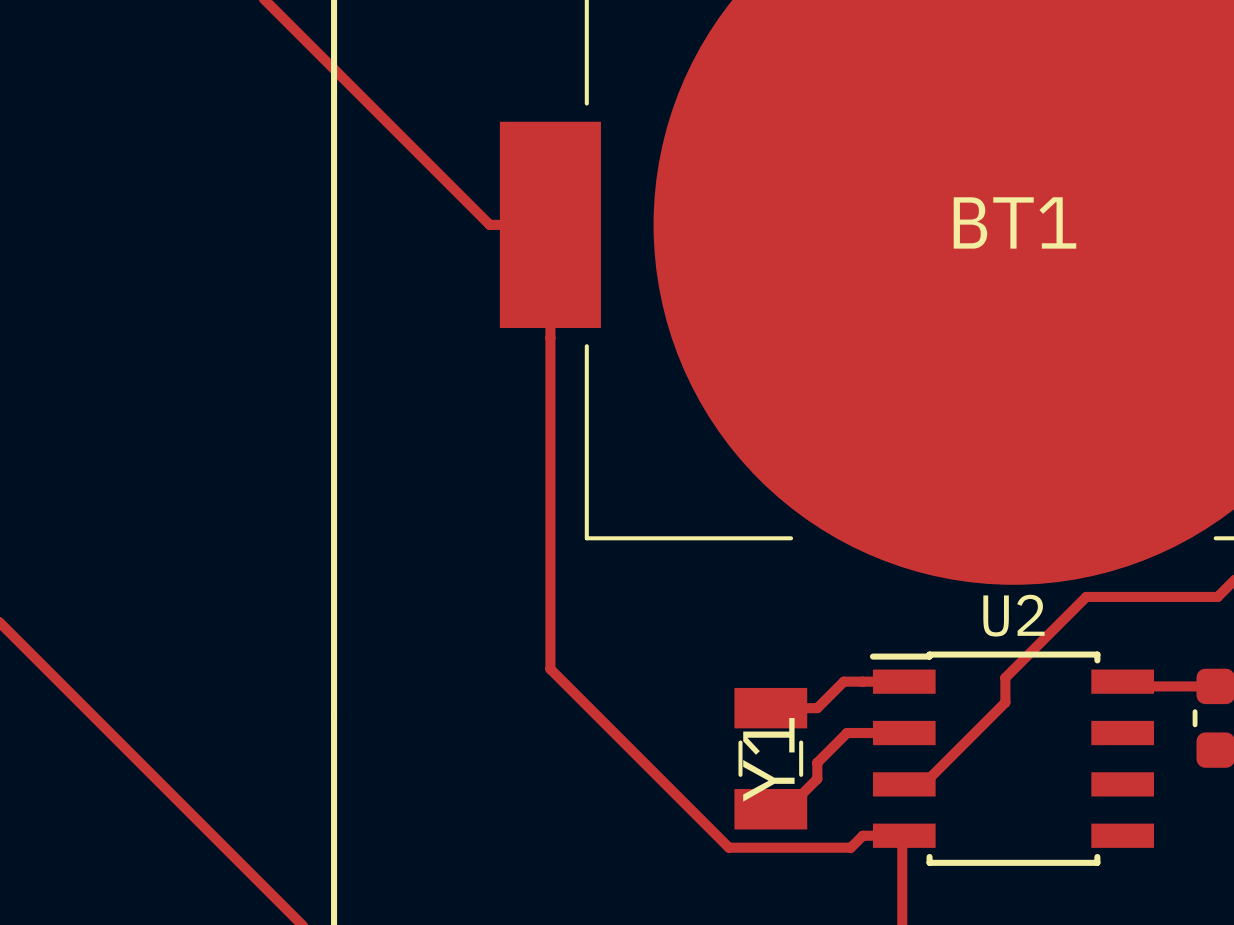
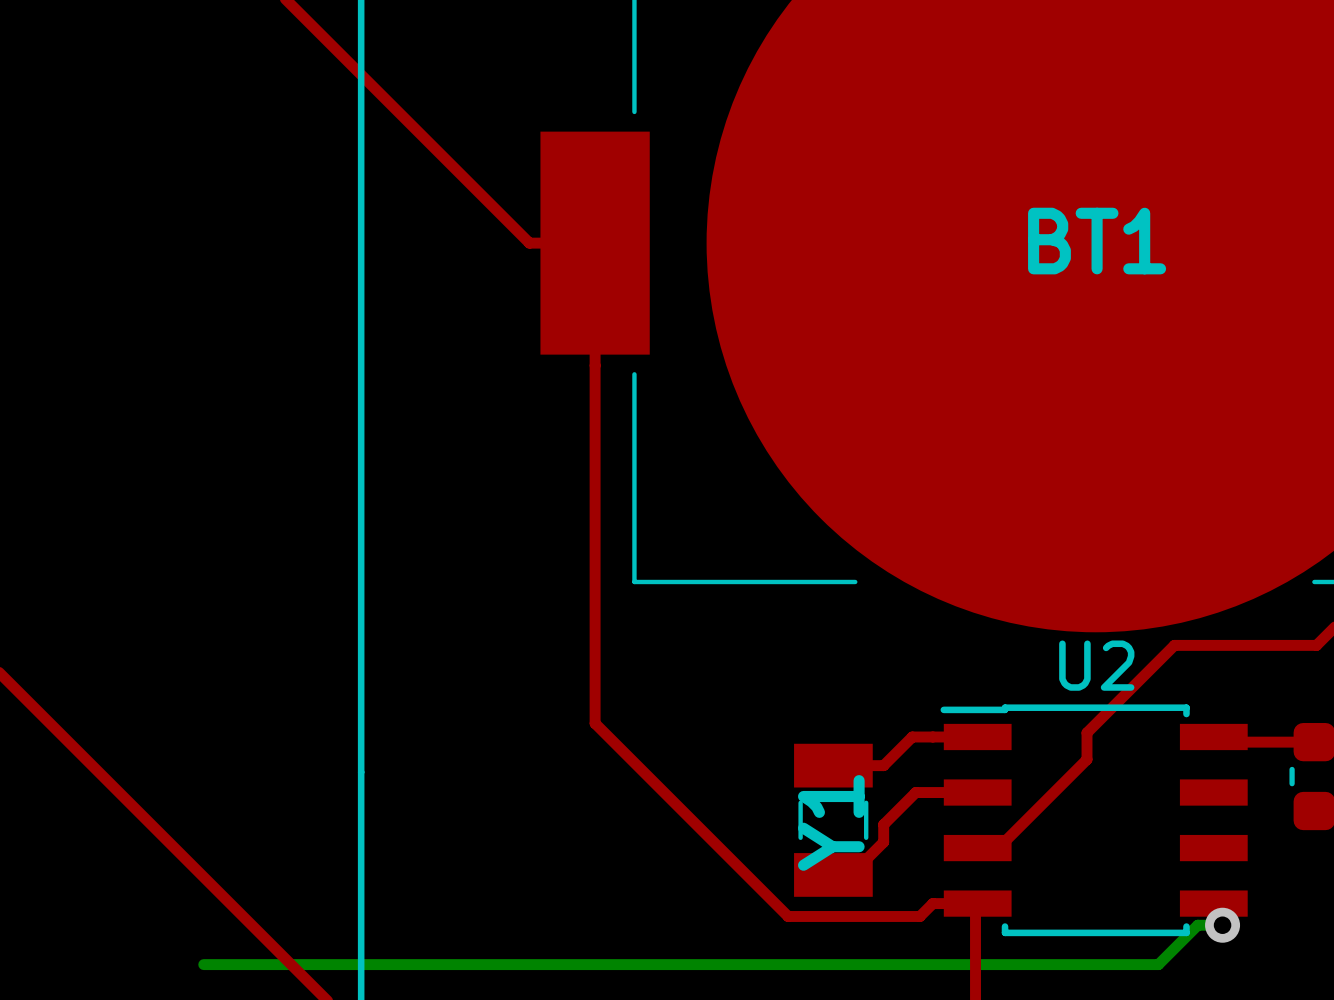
bottom track: none -> (1222, 925) (1197, 925) (1158, 964) (203, 964)
via: none -> (1222, 925)

